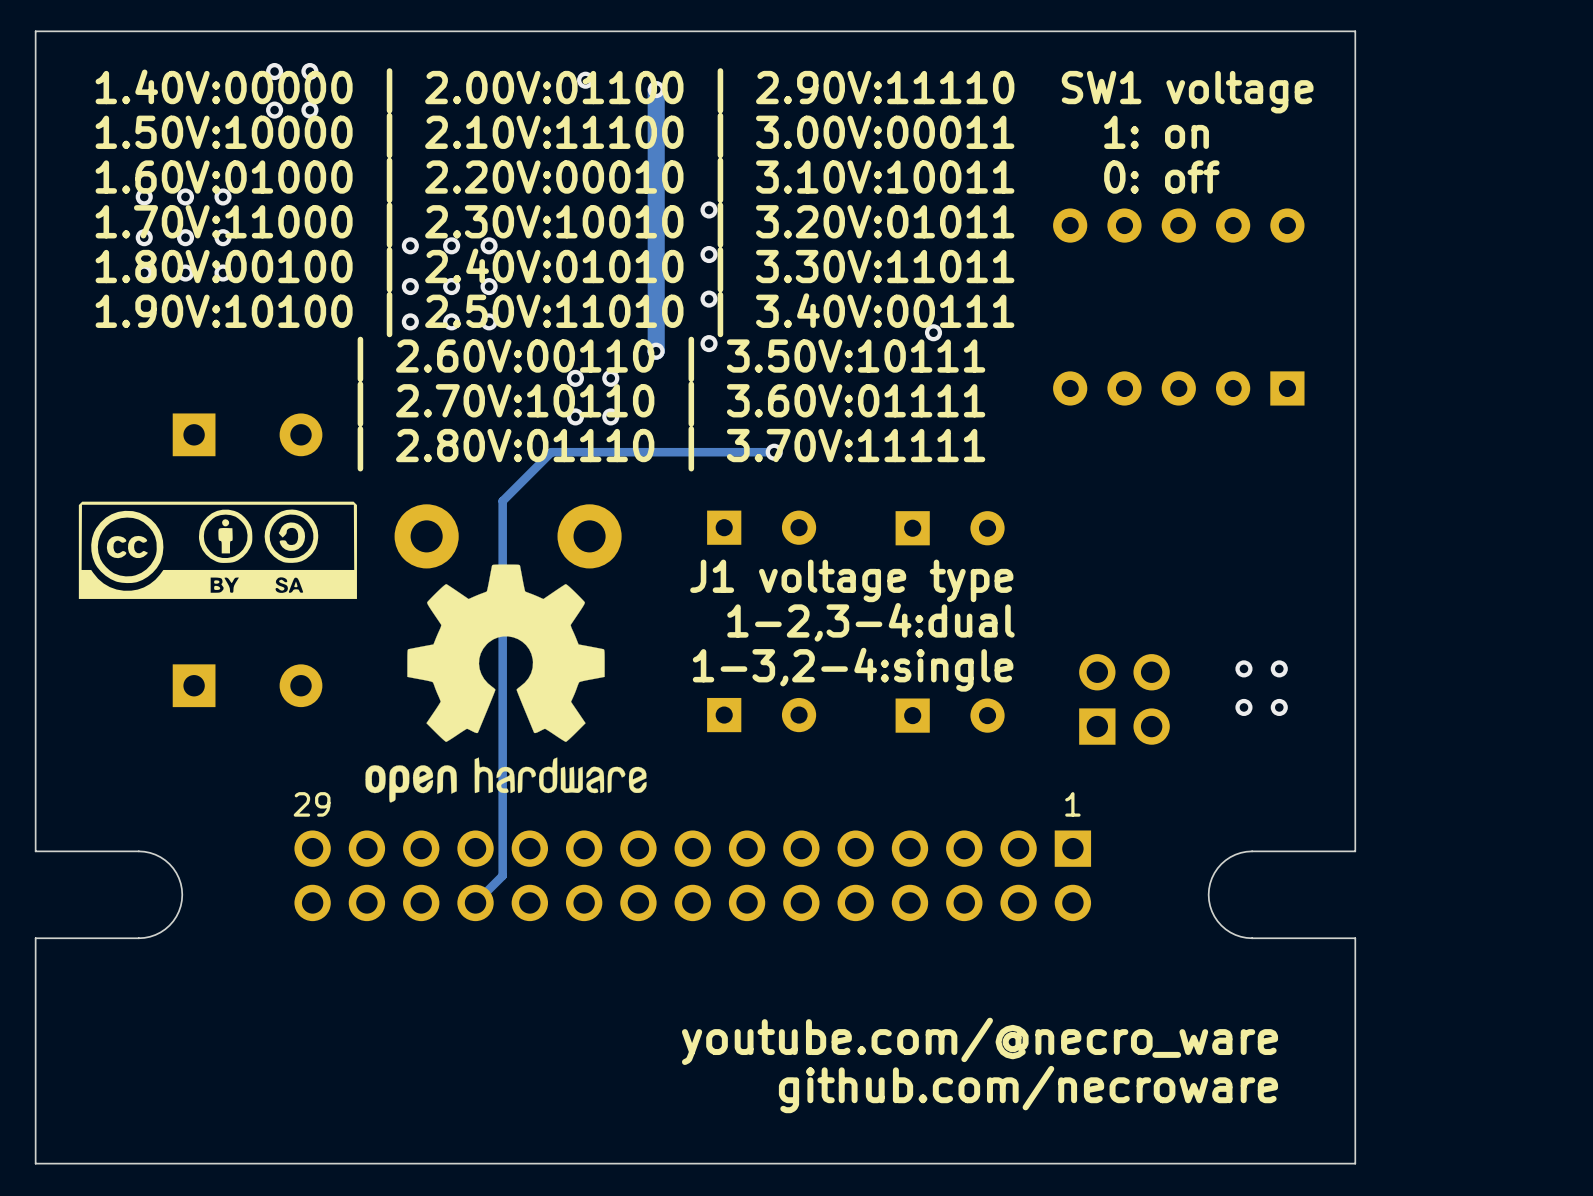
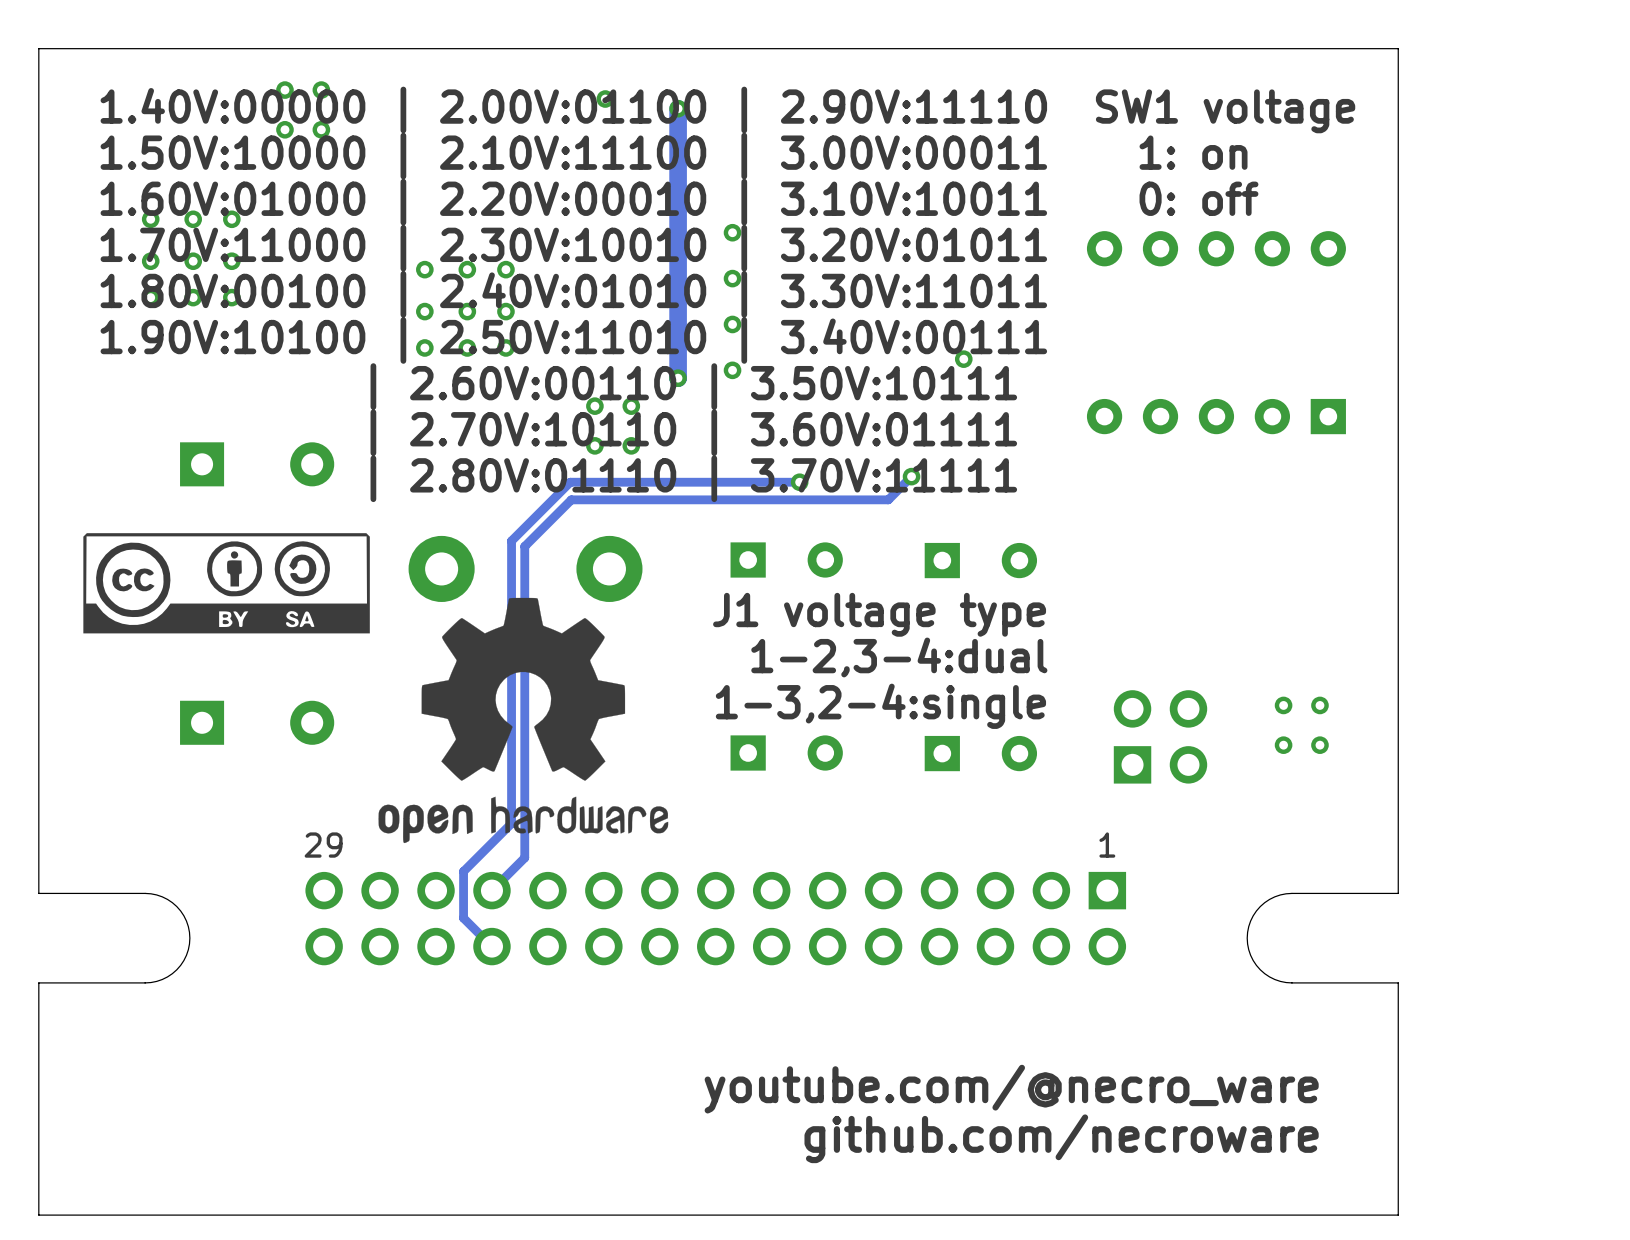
track: none -> (911, 476) (888, 499) (571, 499) (524, 546) (524, 857) (491, 890)
via: none -> (911, 476)
track: (502, 501) (502, 875) (475, 902) -> (519, 532) (511, 540) (511, 823) (463, 871) (463, 918) (491, 946)

